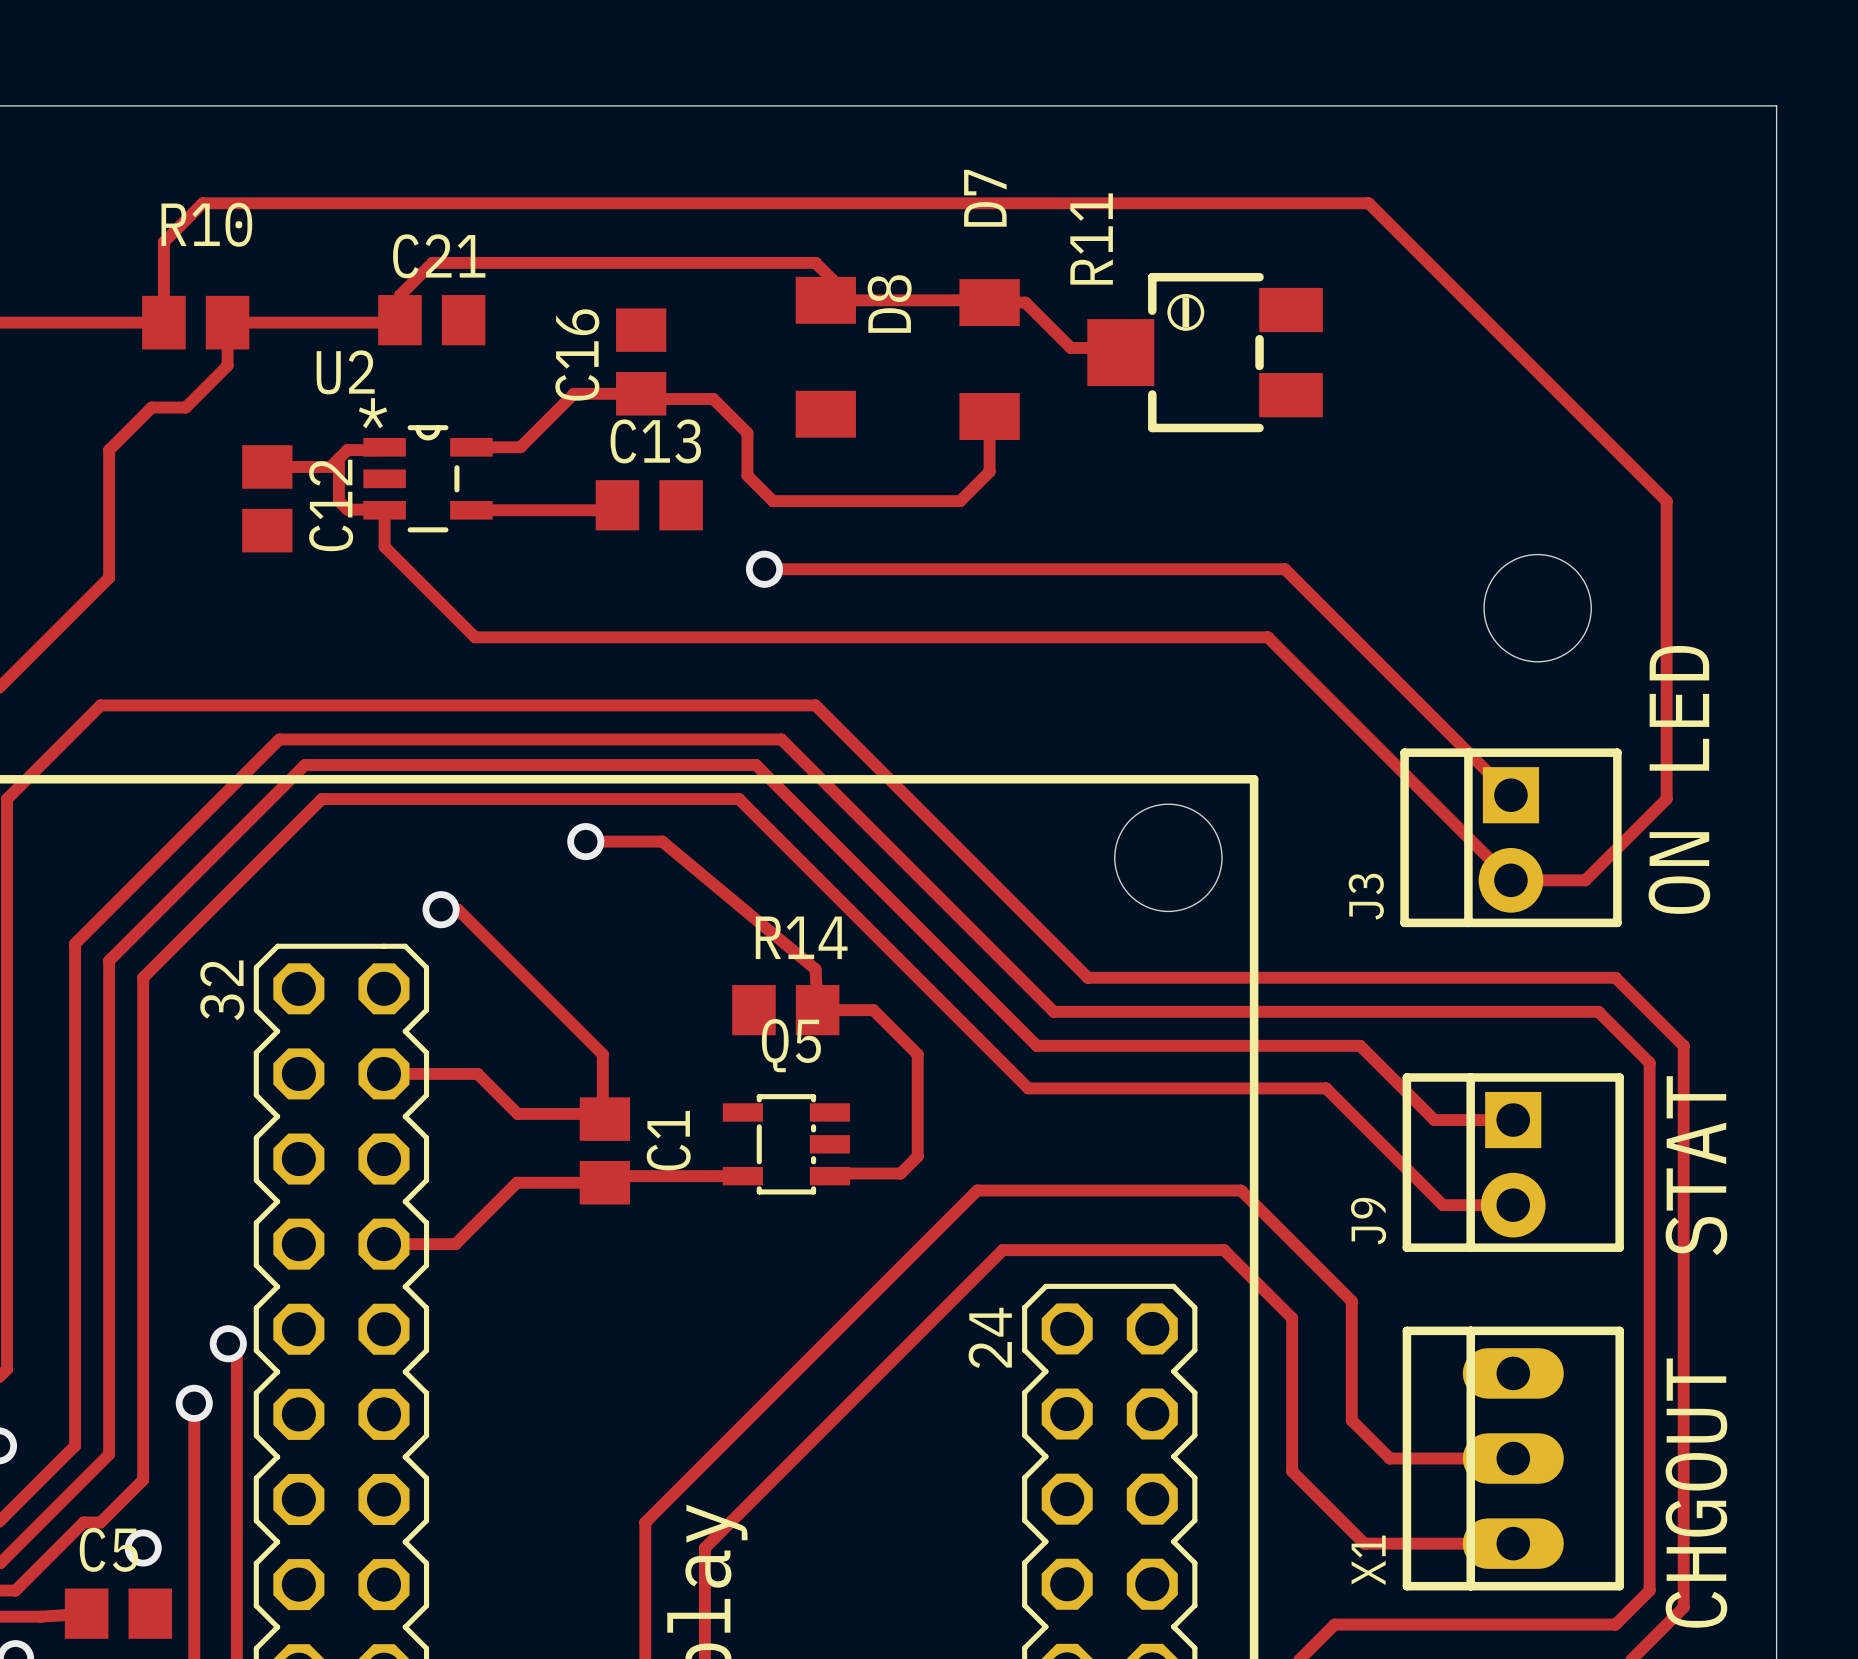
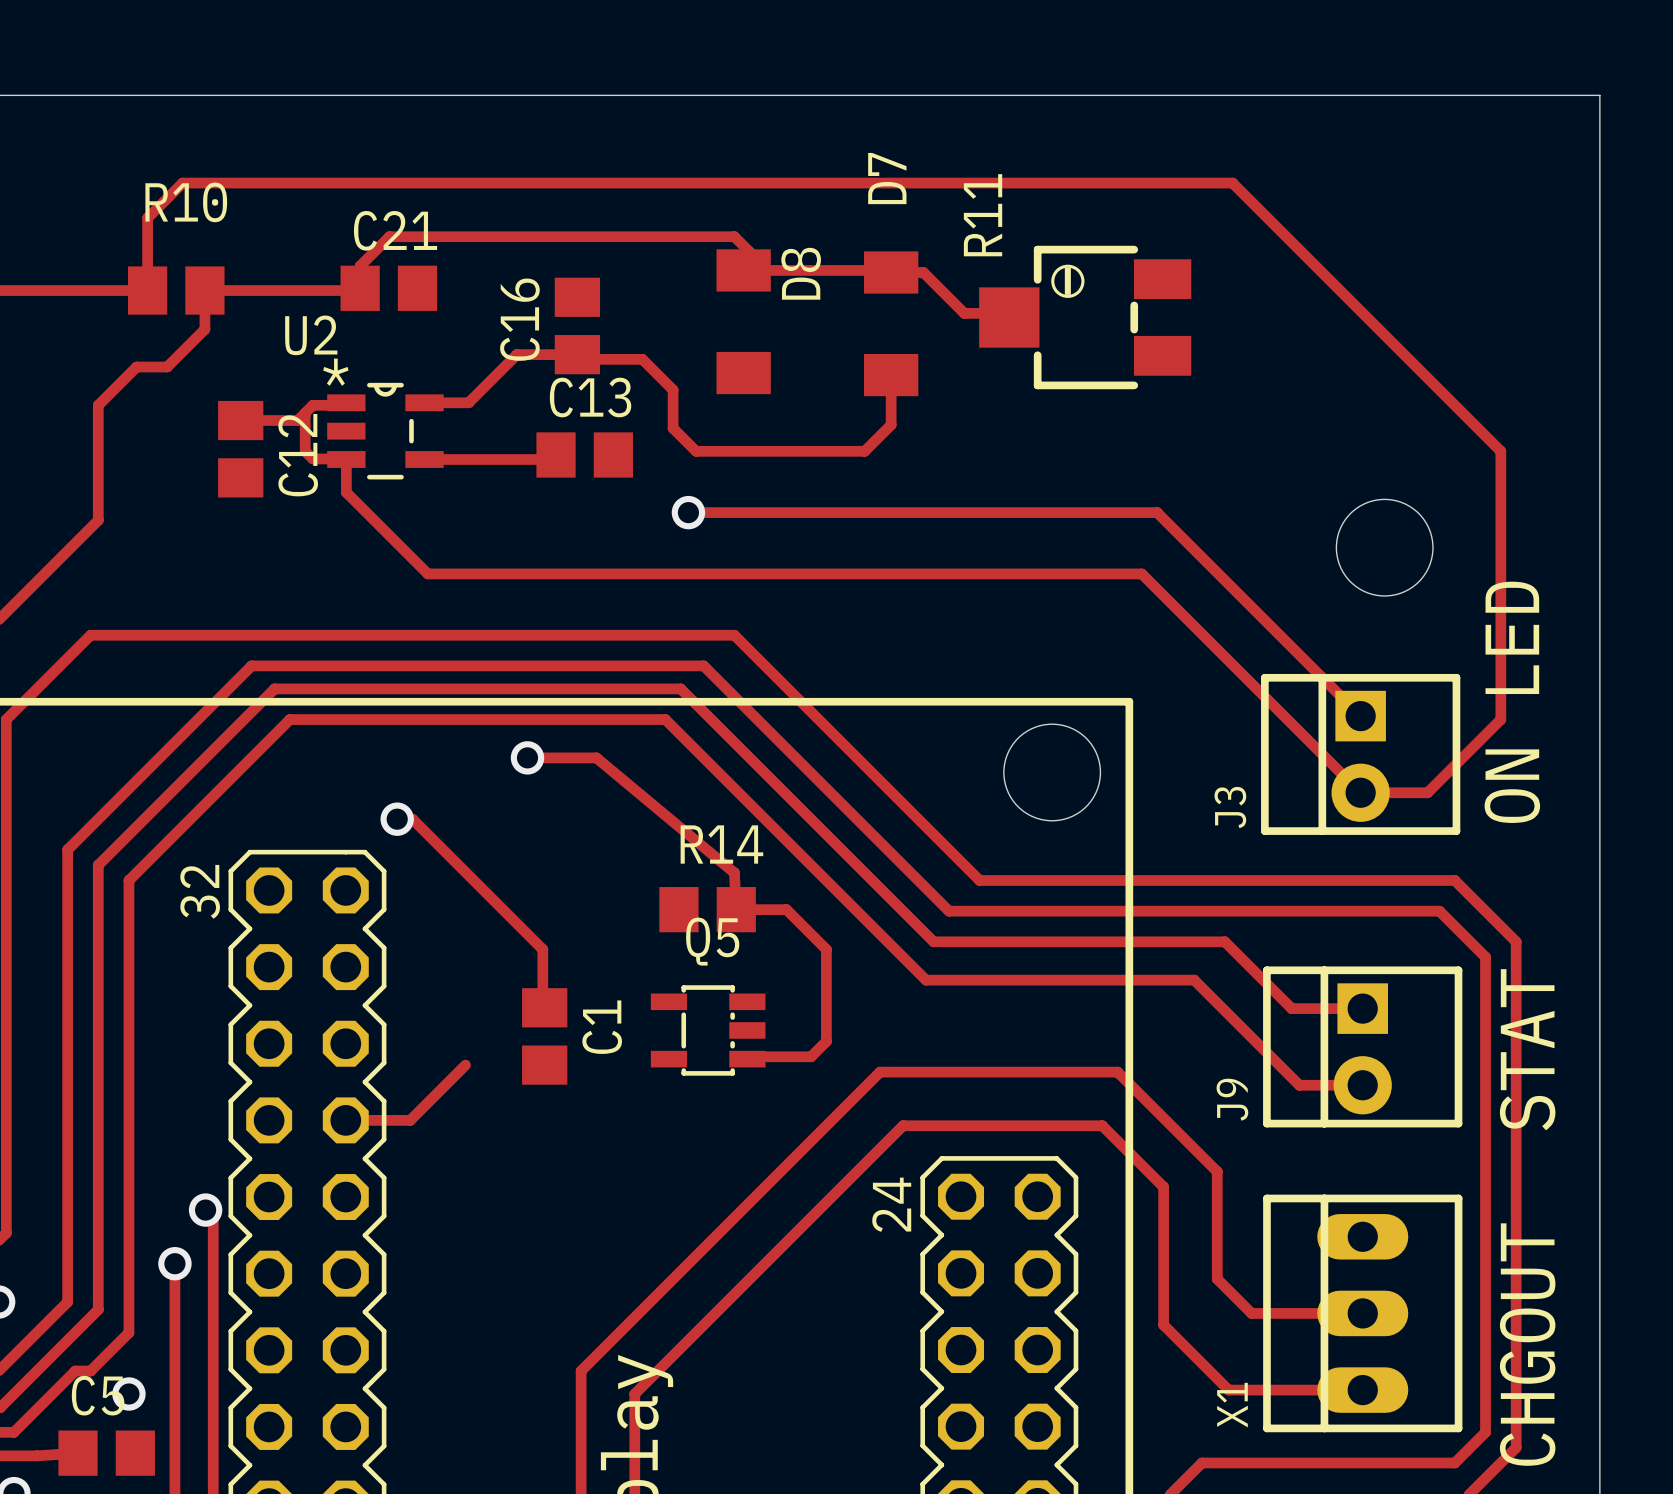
track: (383, 1073) (477, 1073) (517, 1113) (599, 1113) (604, 1119) -> none
track: (742, 1176) (611, 1176) (604, 1182) (516, 1182) -> none

